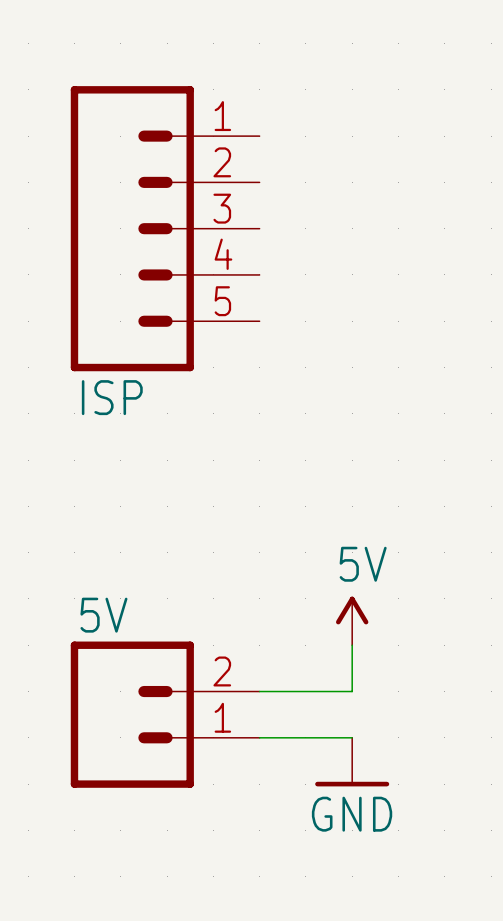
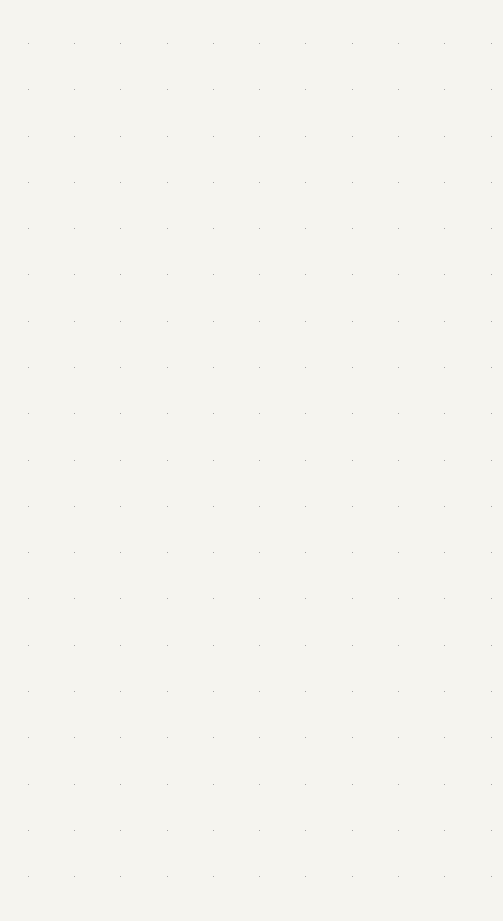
ISP: (165, 228) -> none
power symbol: 5V (352, 620) -> none
wire: (352, 645) (352, 691) (259, 691) -> none
5V: (165, 714) -> none
wire: (259, 737) (352, 737) -> none
power symbol: GND (352, 762) -> none

